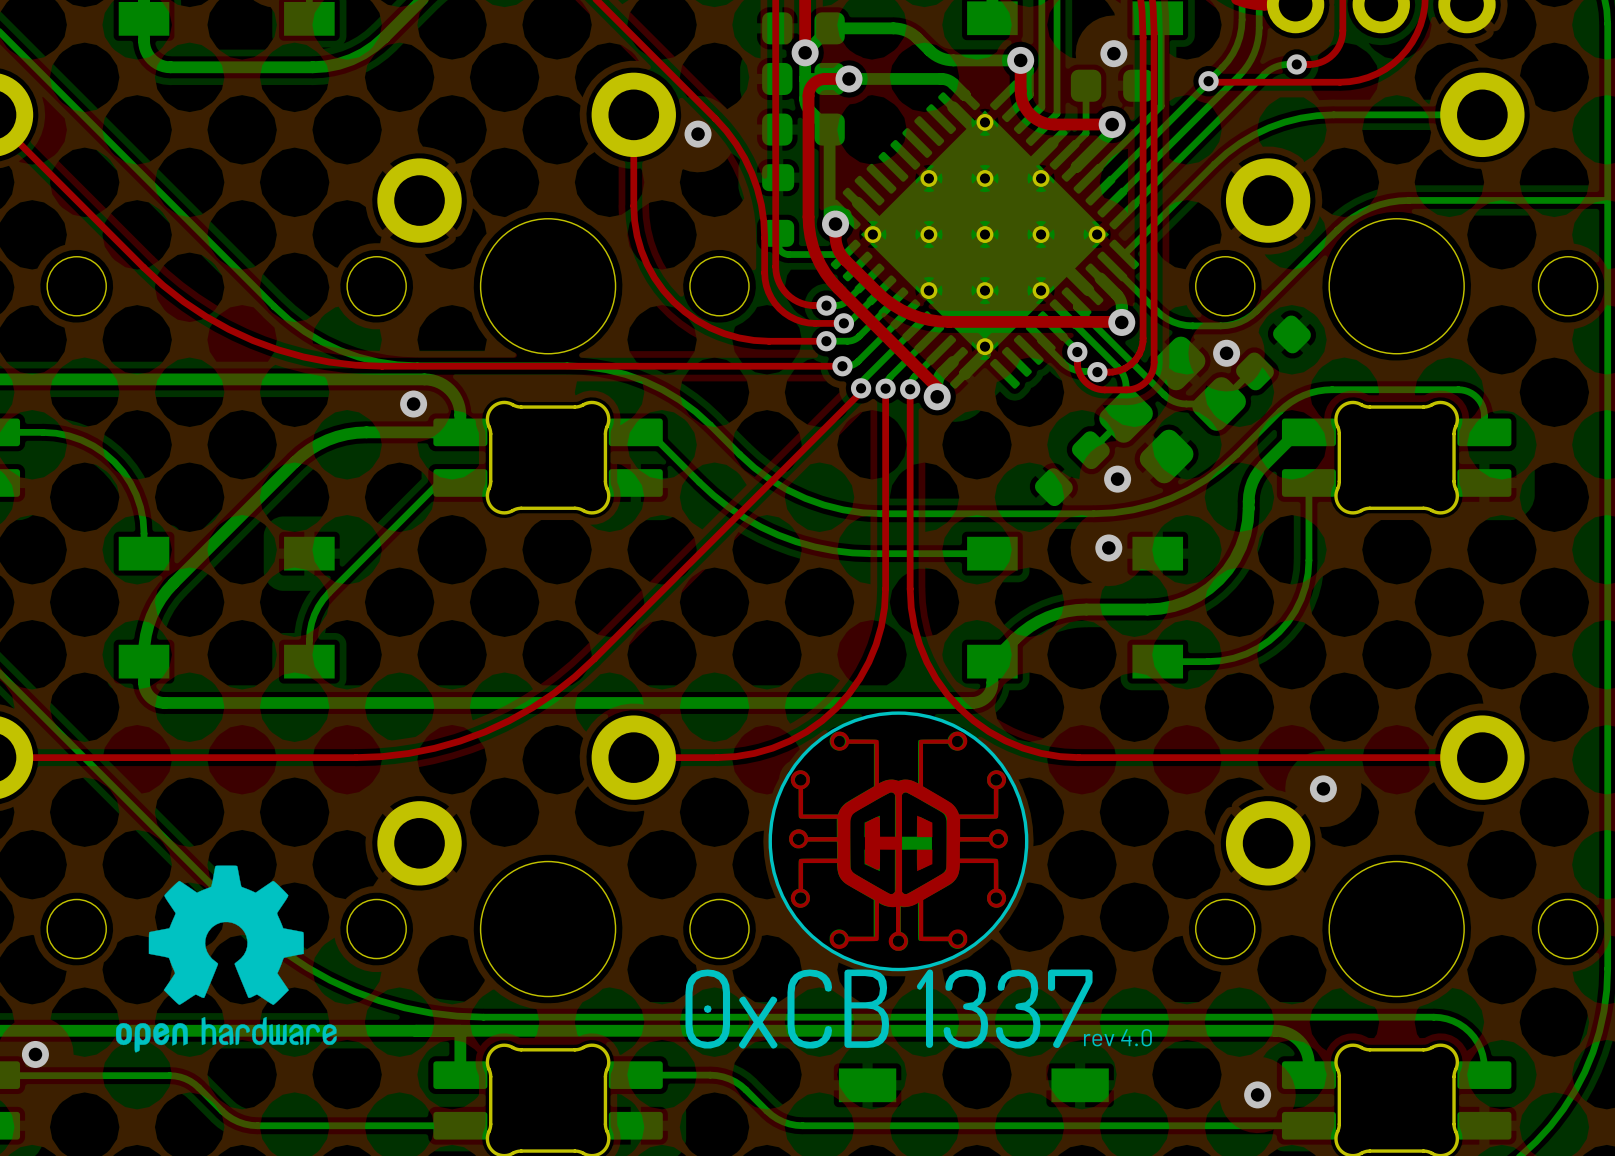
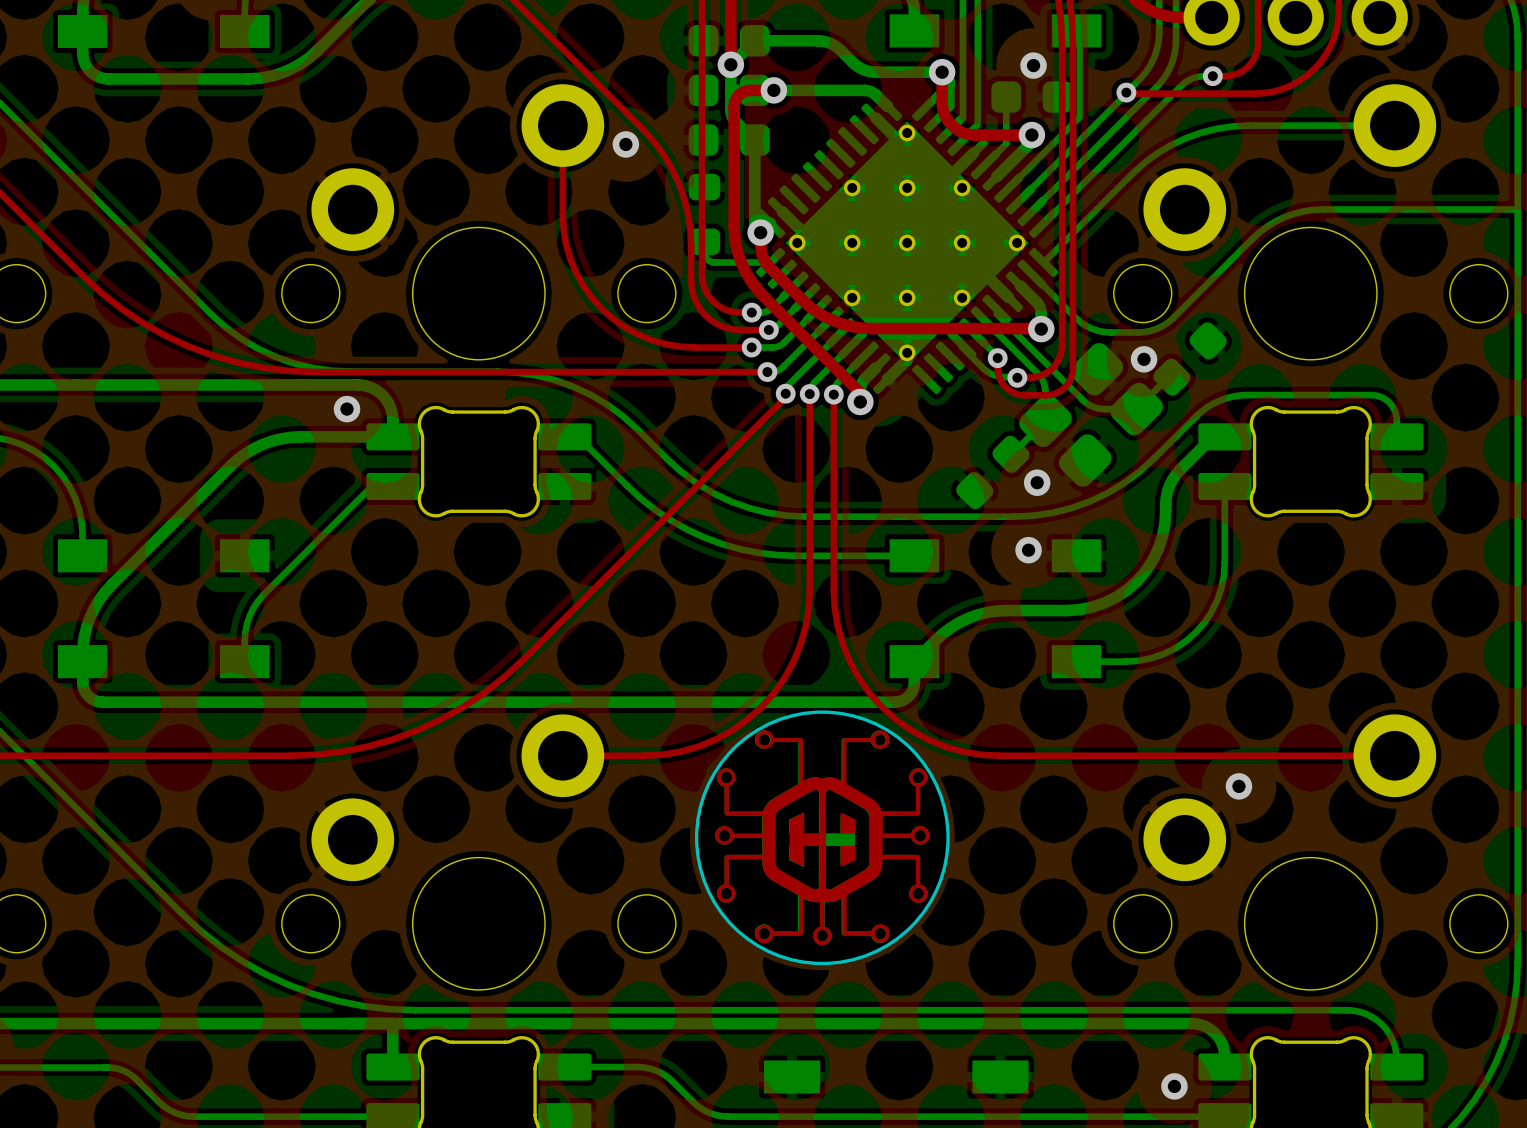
drawing: [115, 865, 337, 1053] -> none
drawing: [685, 969, 1093, 1049] -> none
text: rev 4.0 (1117, 1037) -> none

